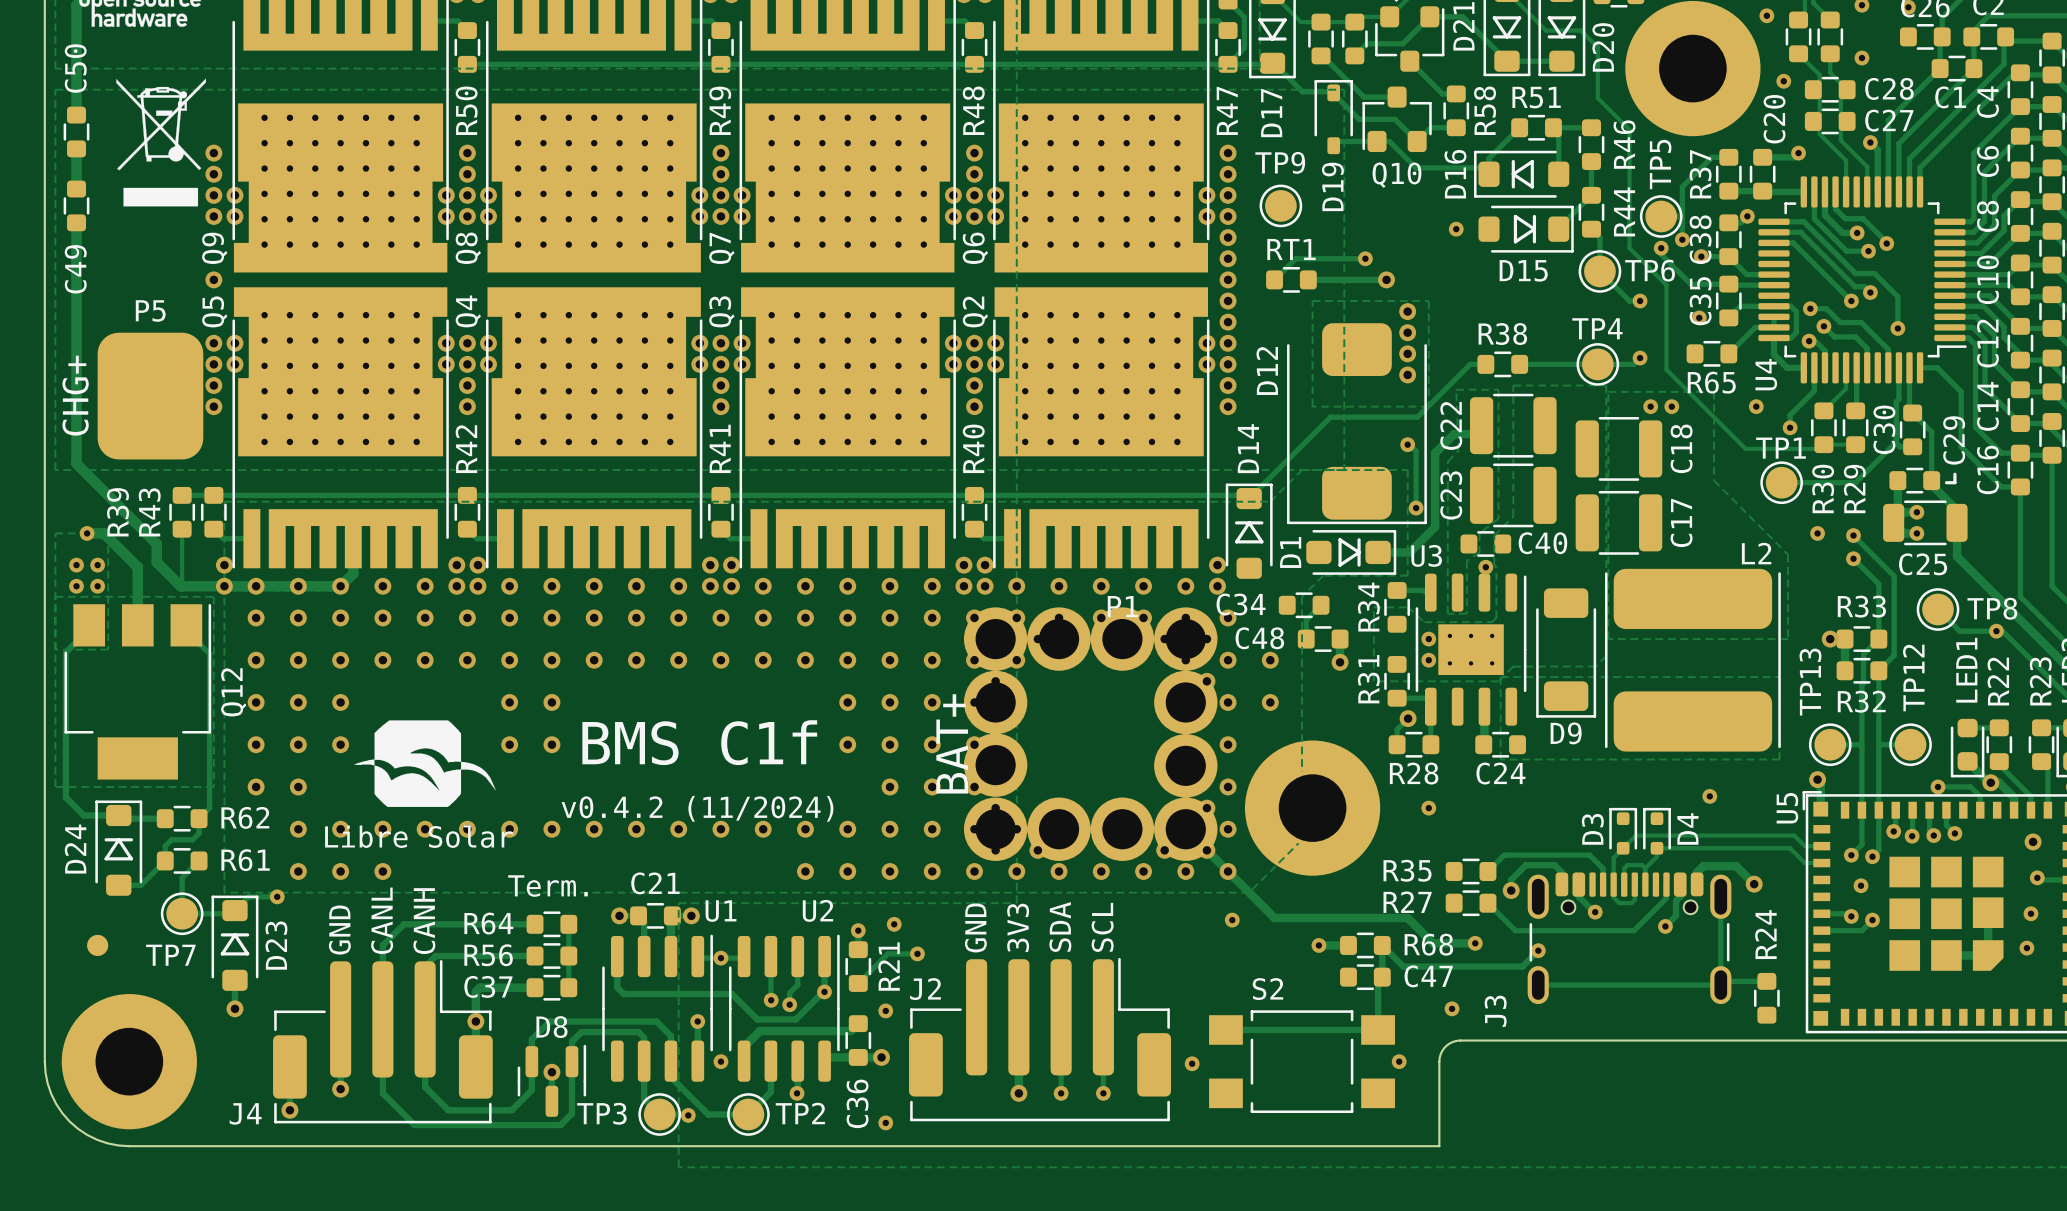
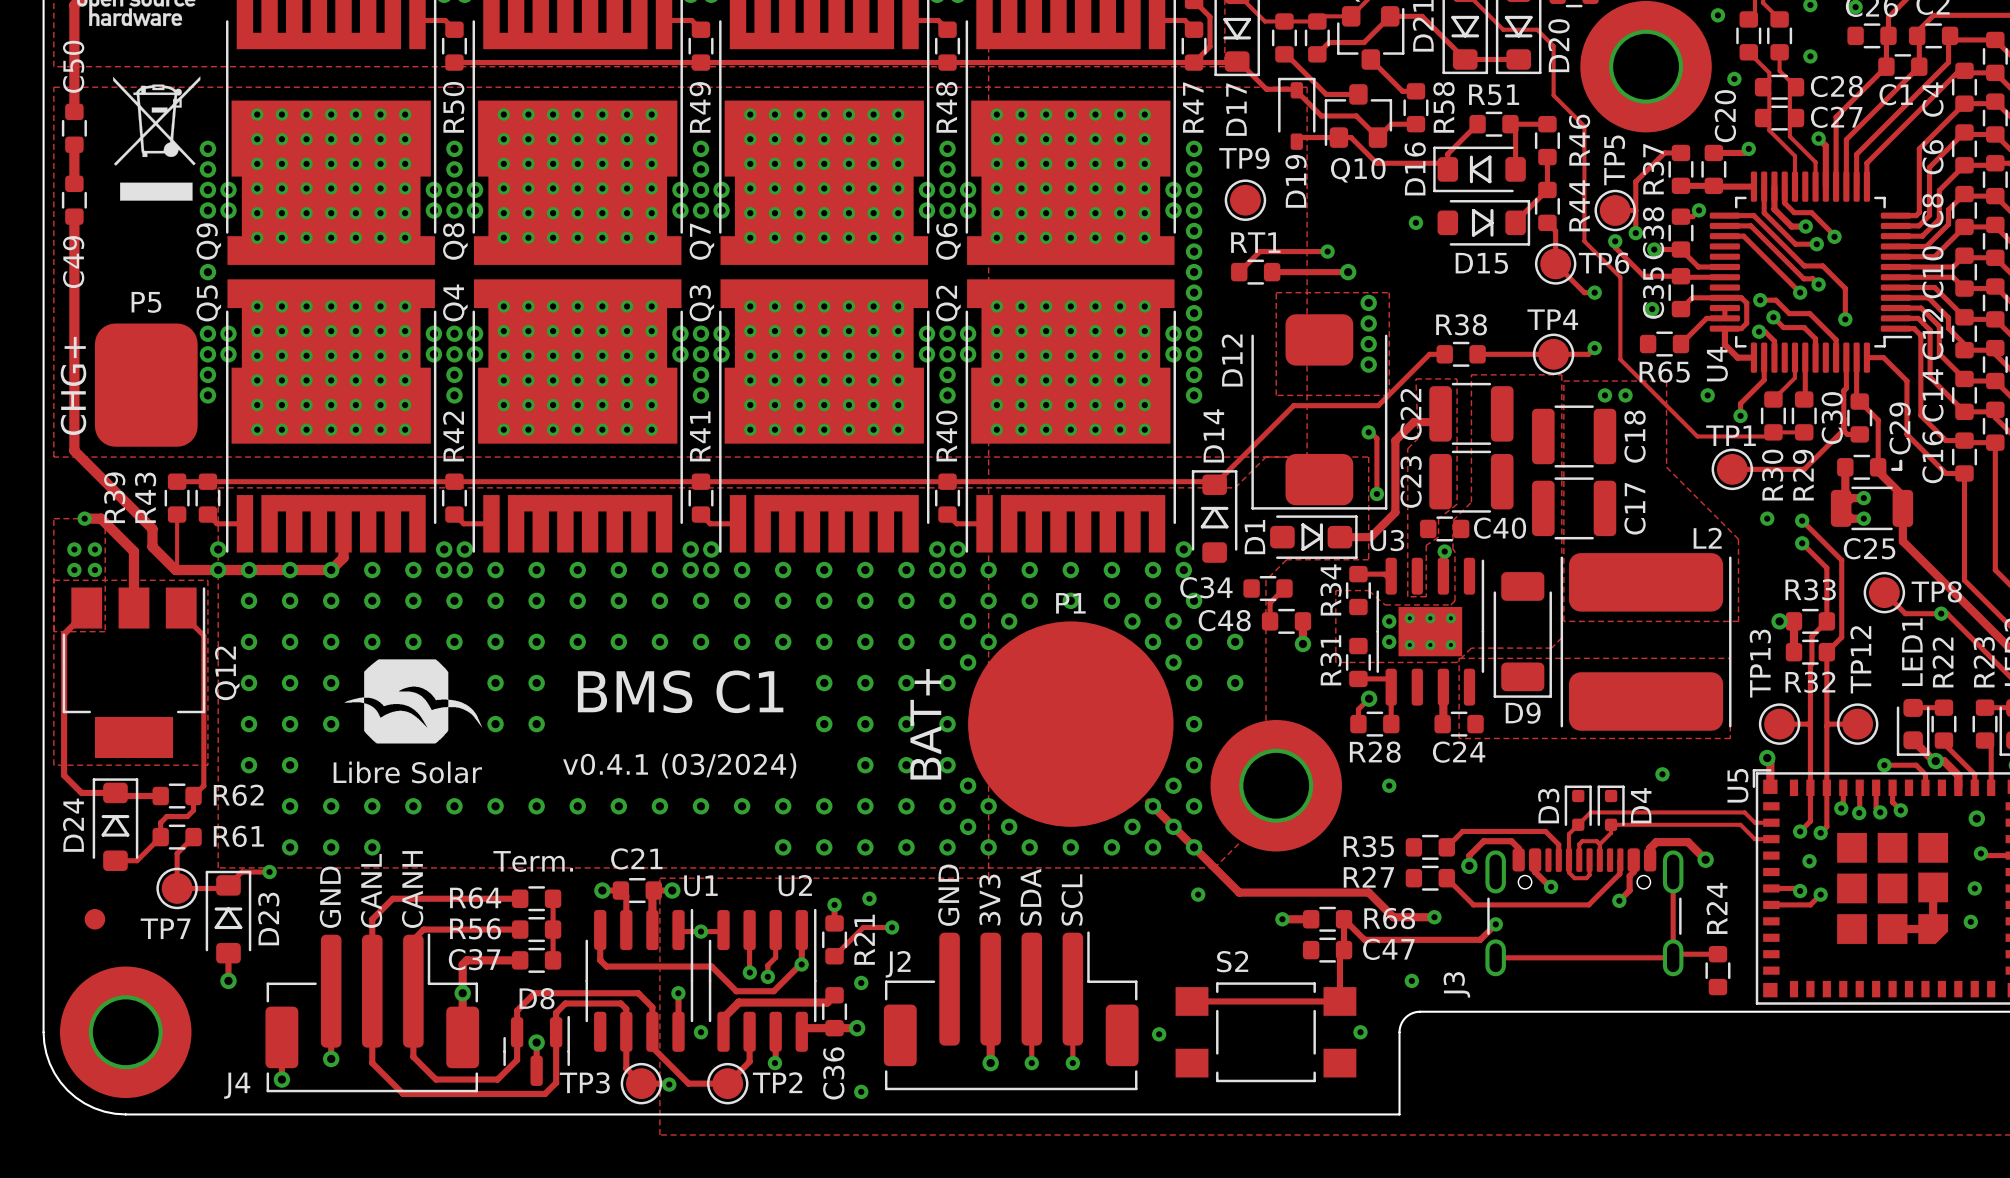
P1 footprint: [963, 607, 1218, 861] -> [968, 621, 1174, 827]
text: BMS C1f (699, 742) -> BMS C1 (680, 691)
drawing position: (425, 763) -> (413, 701)
text: v0.4.2 (11/2024) (697, 808) -> v0.4.1 (03/2024) (679, 765)

